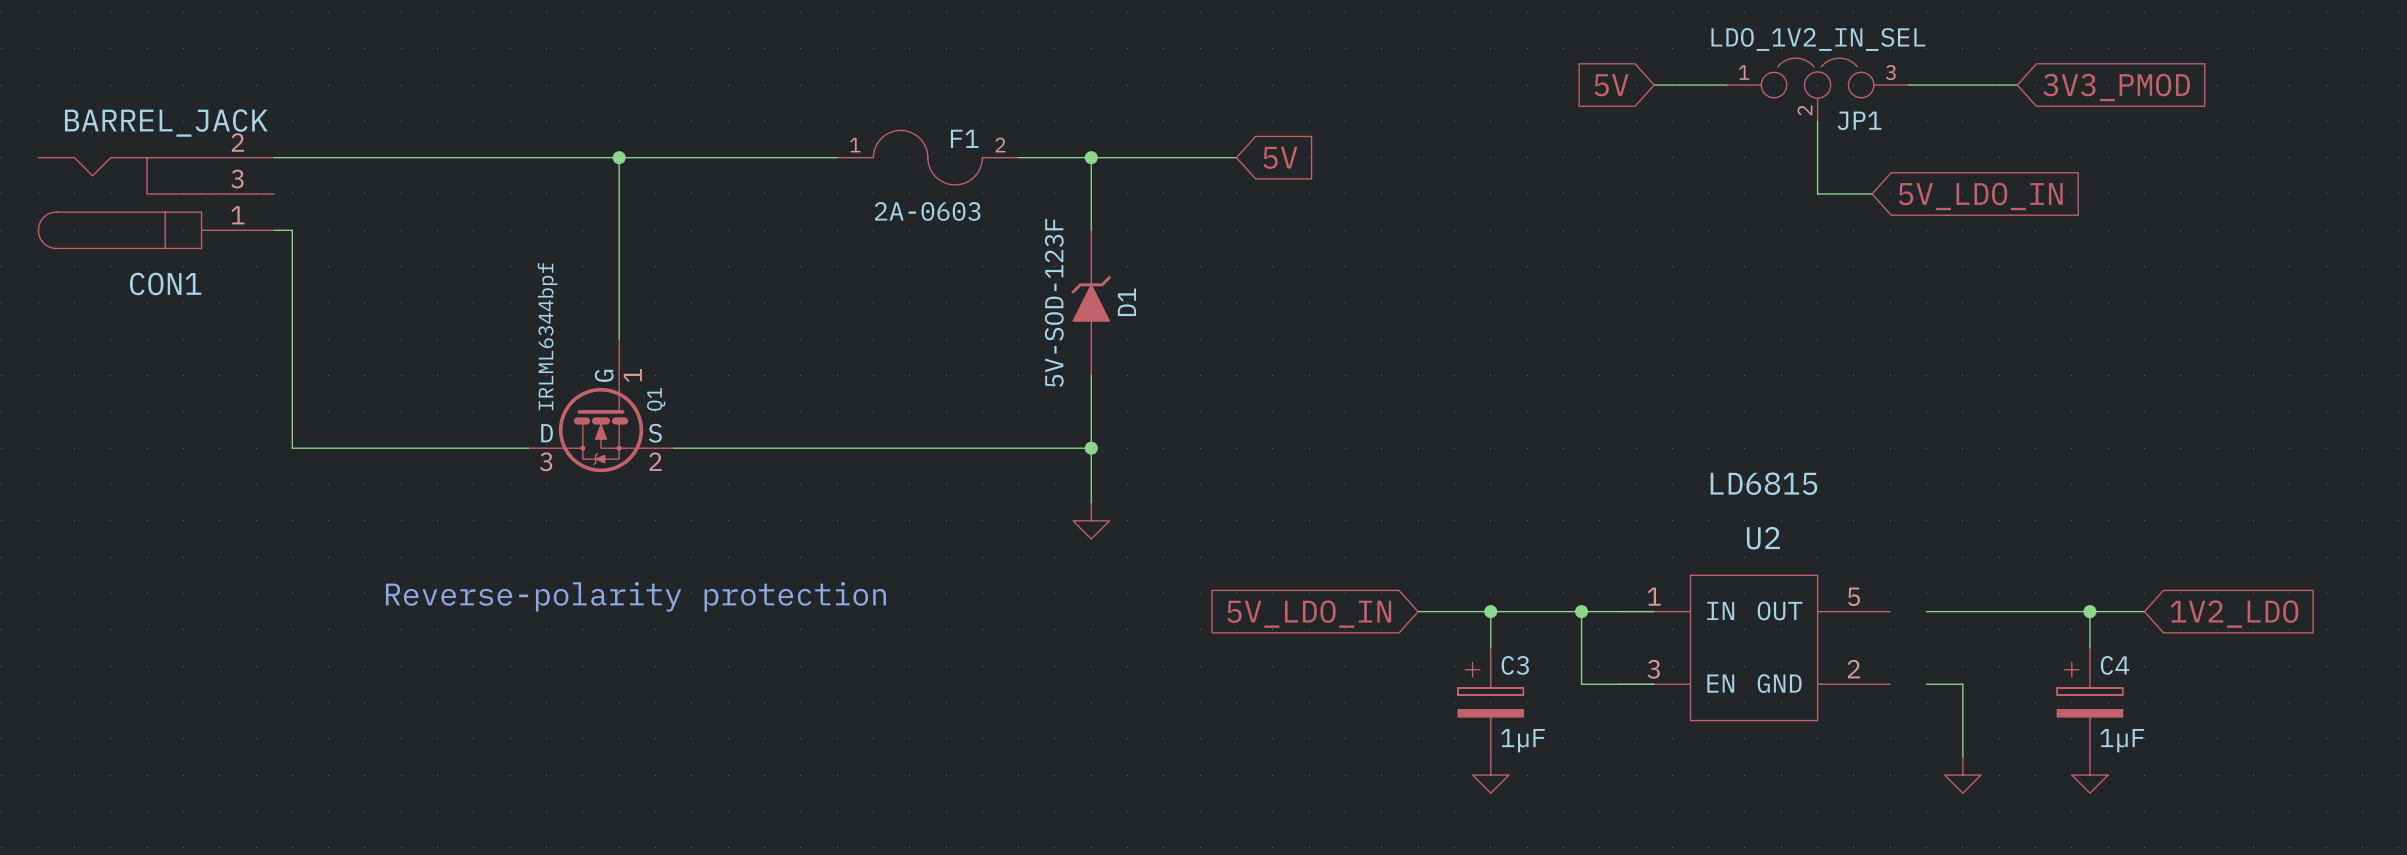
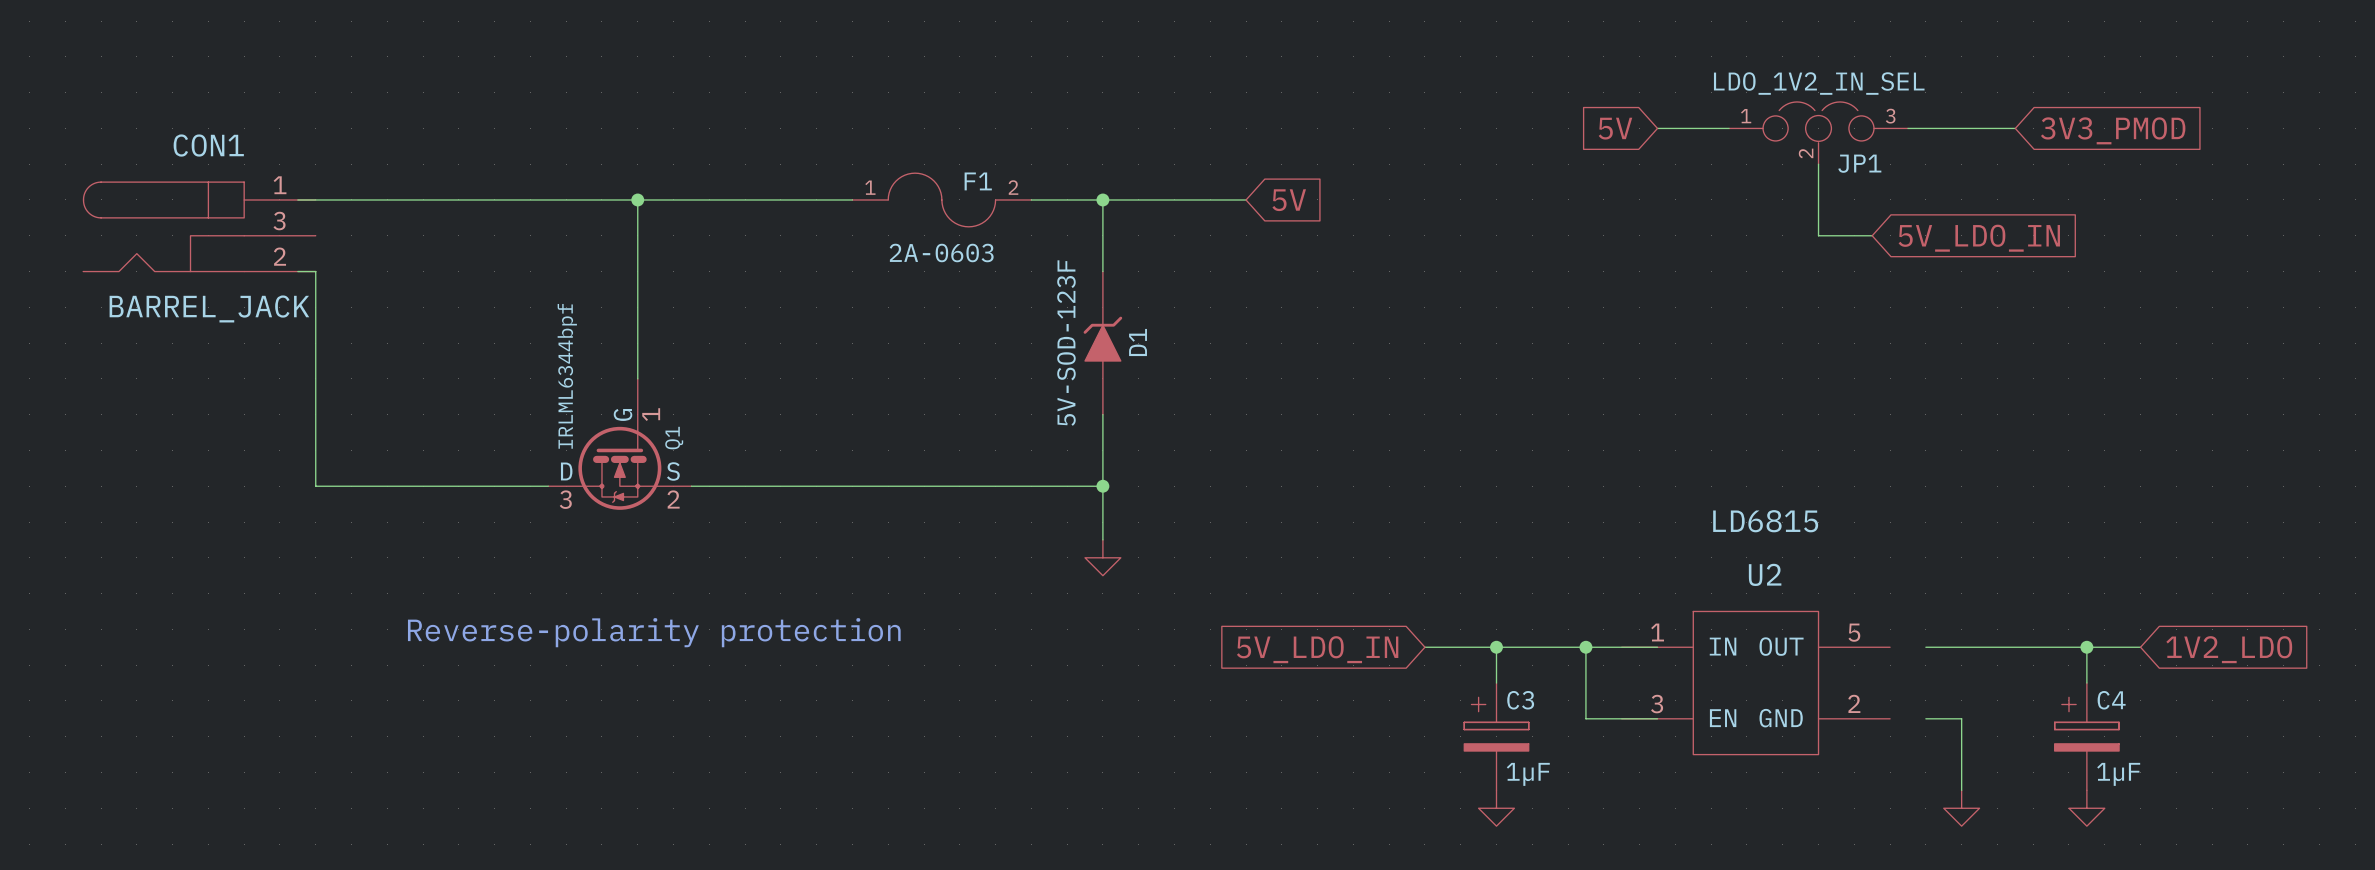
CON1 flip: as is (119, 203) -> up-down (163, 226)

